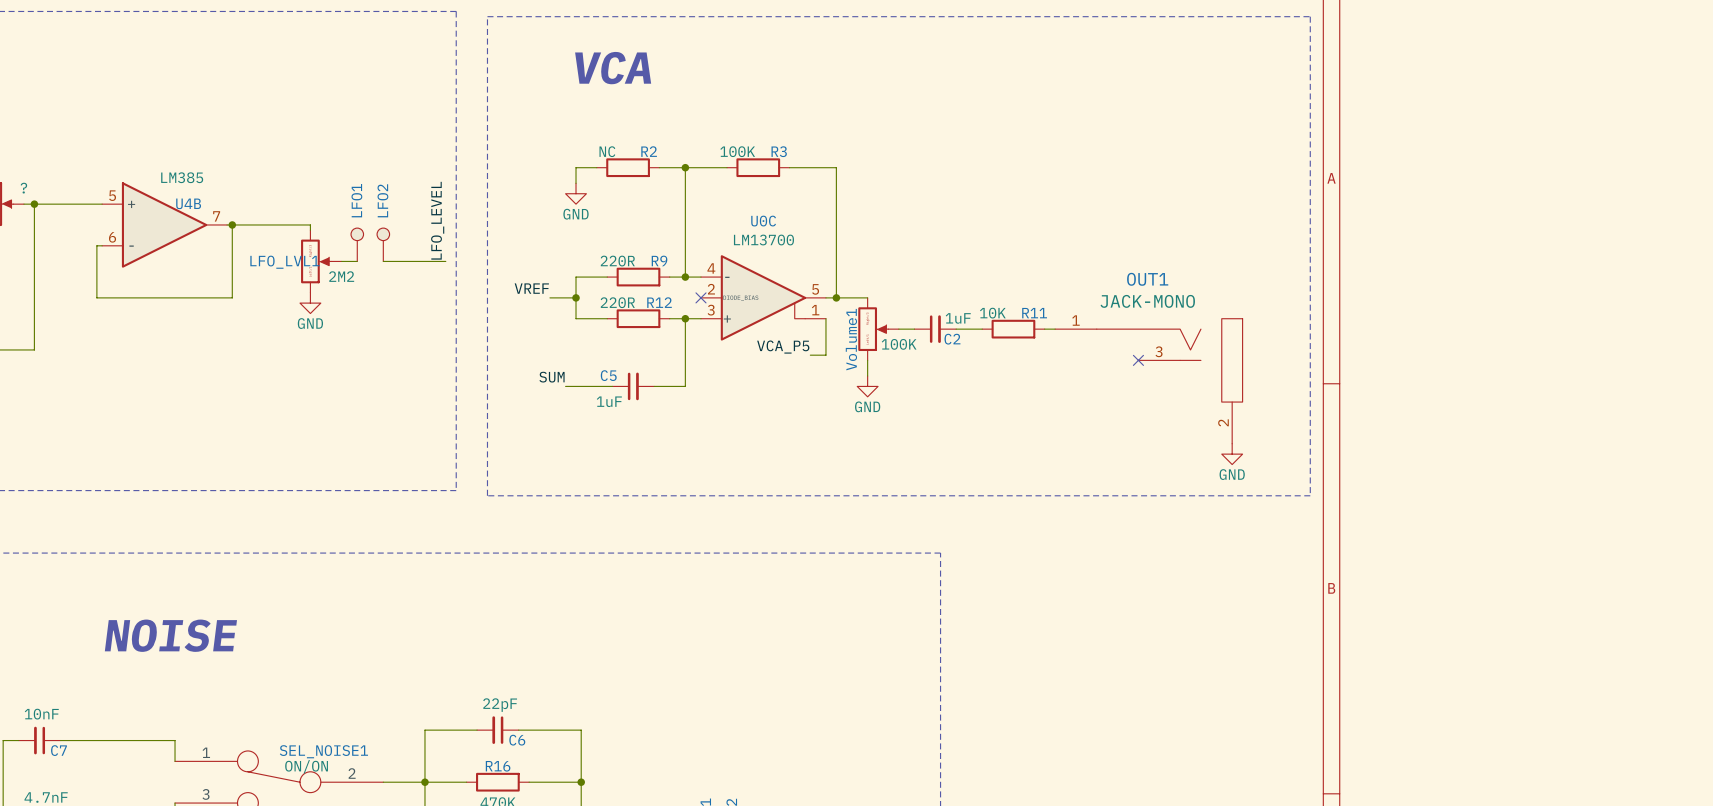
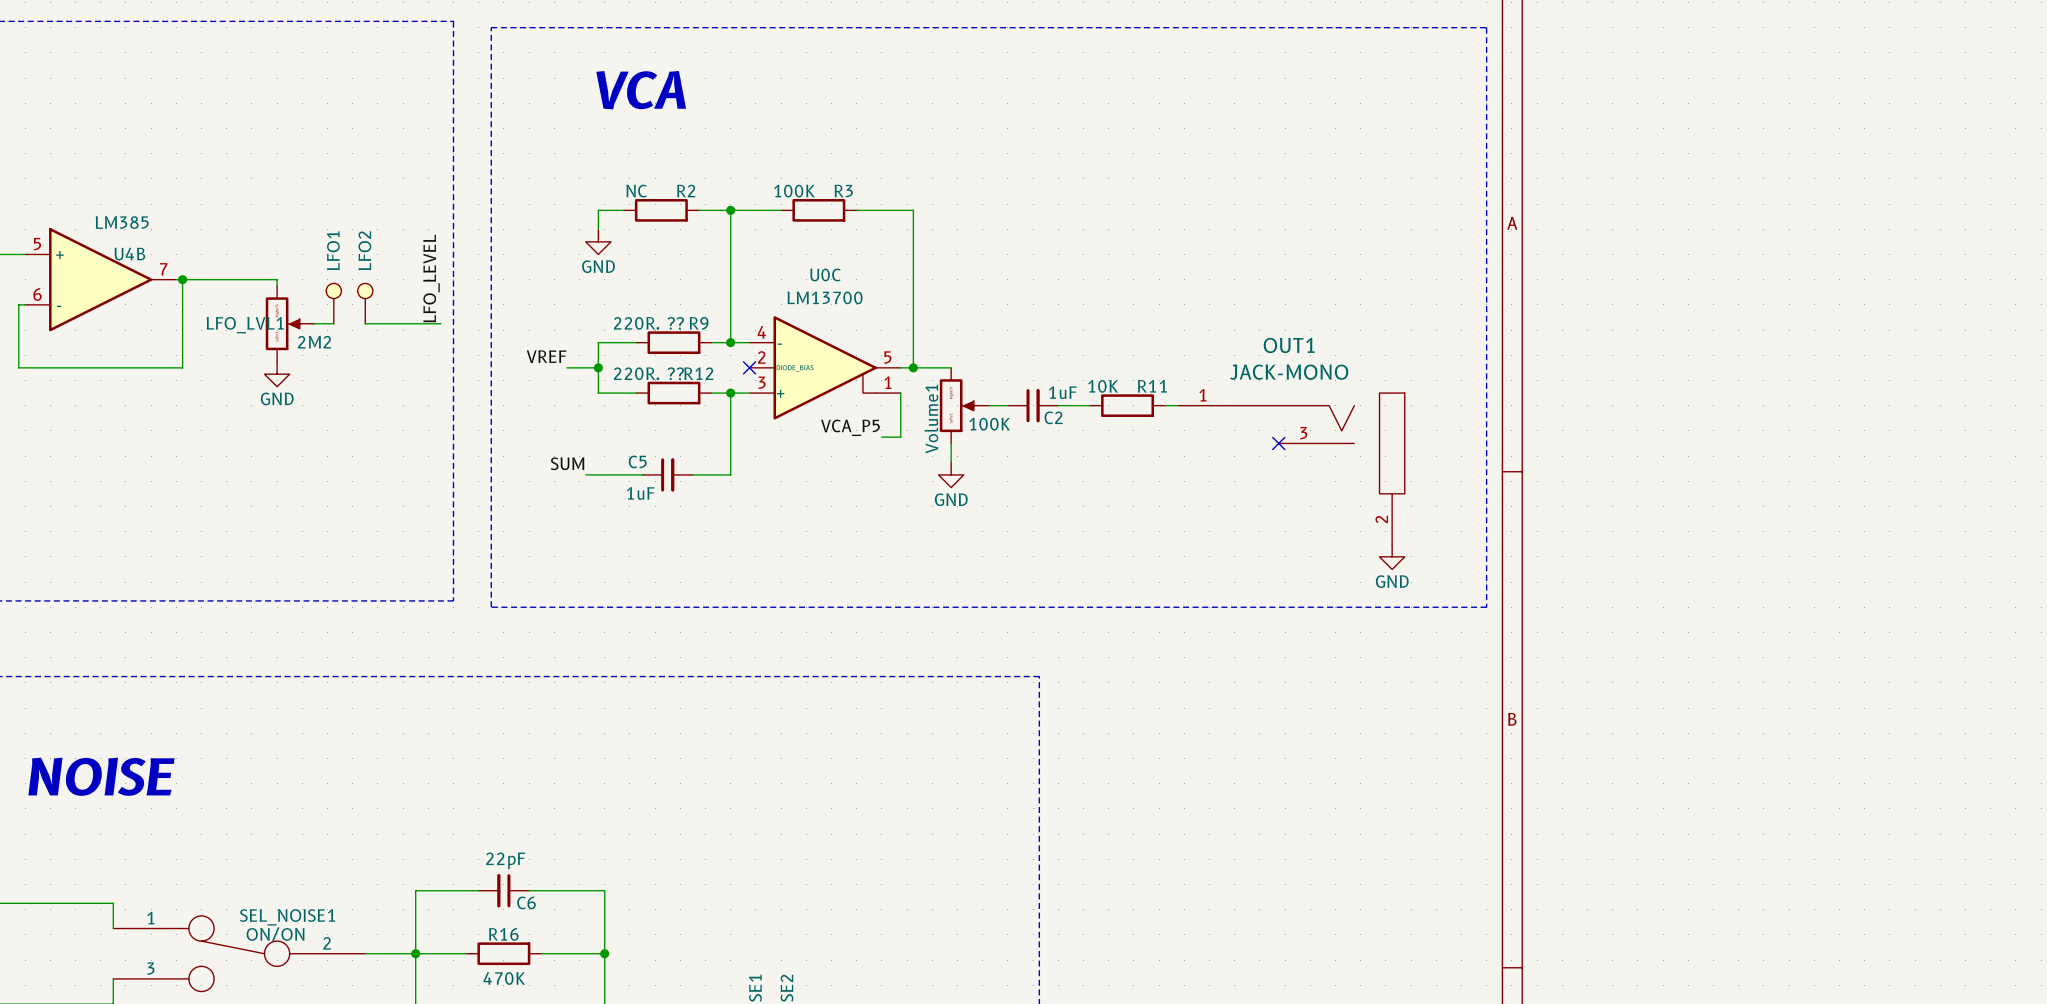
R9 value: 220R (617, 261) -> 220R. ?? (648, 323)
R12 value: 220R (617, 302) -> 220R. ?? (648, 373)

